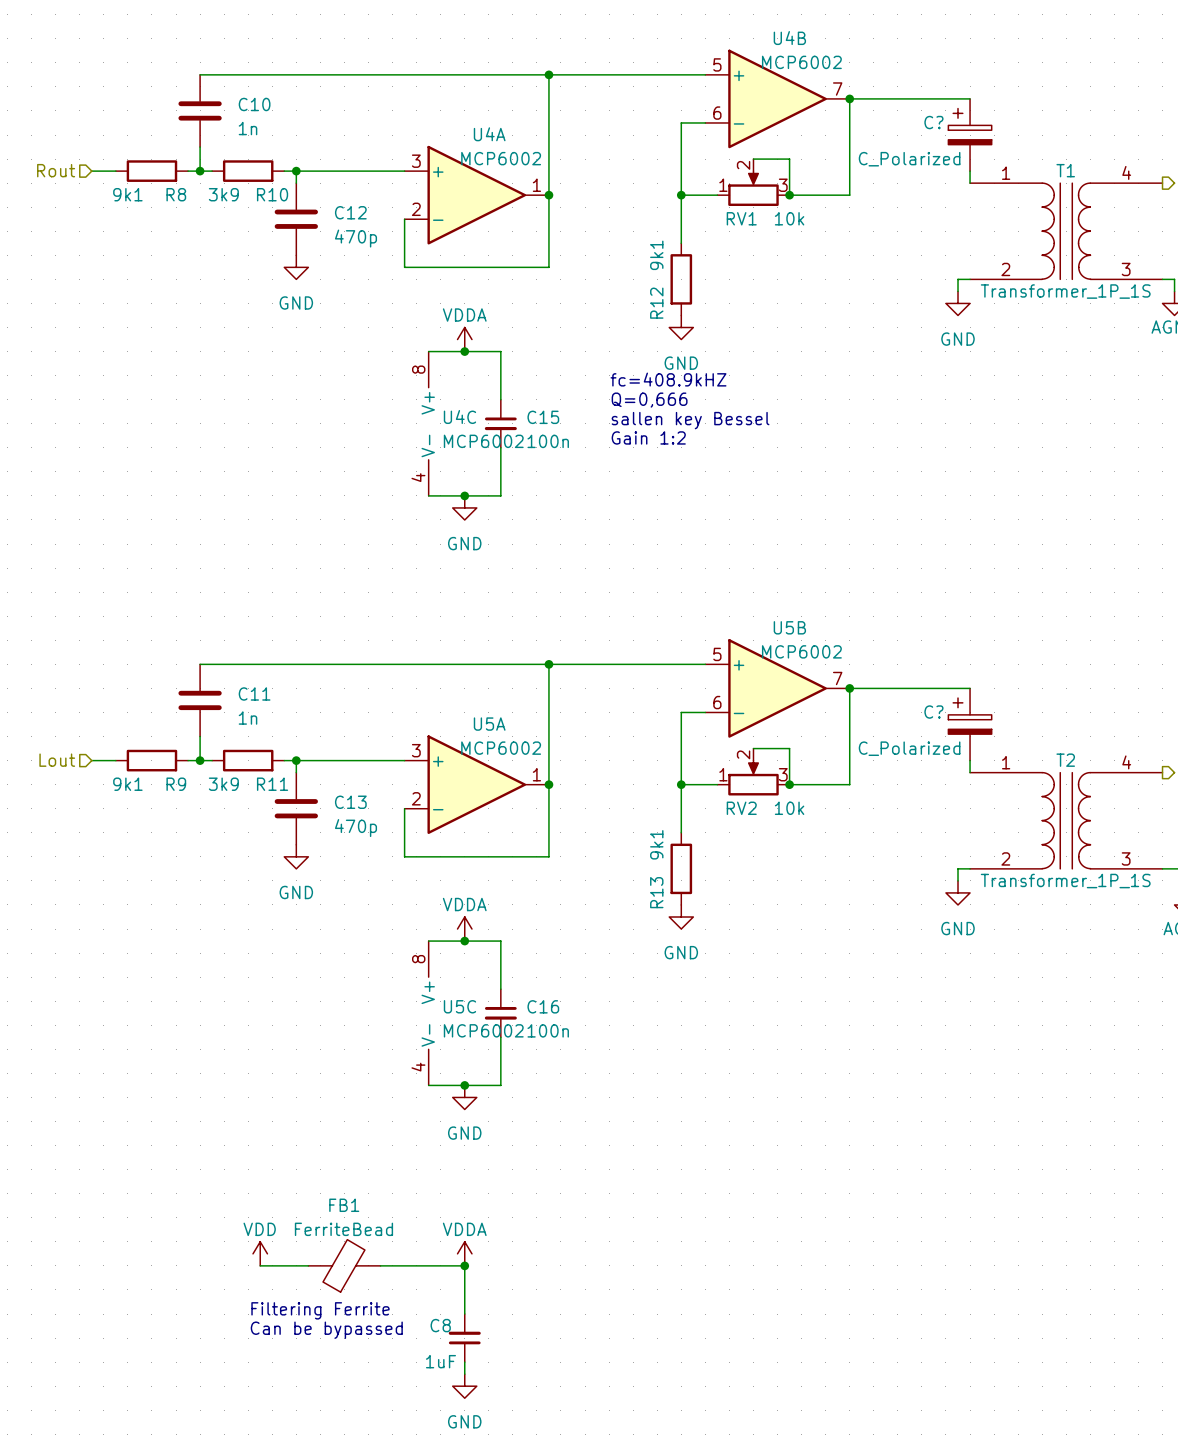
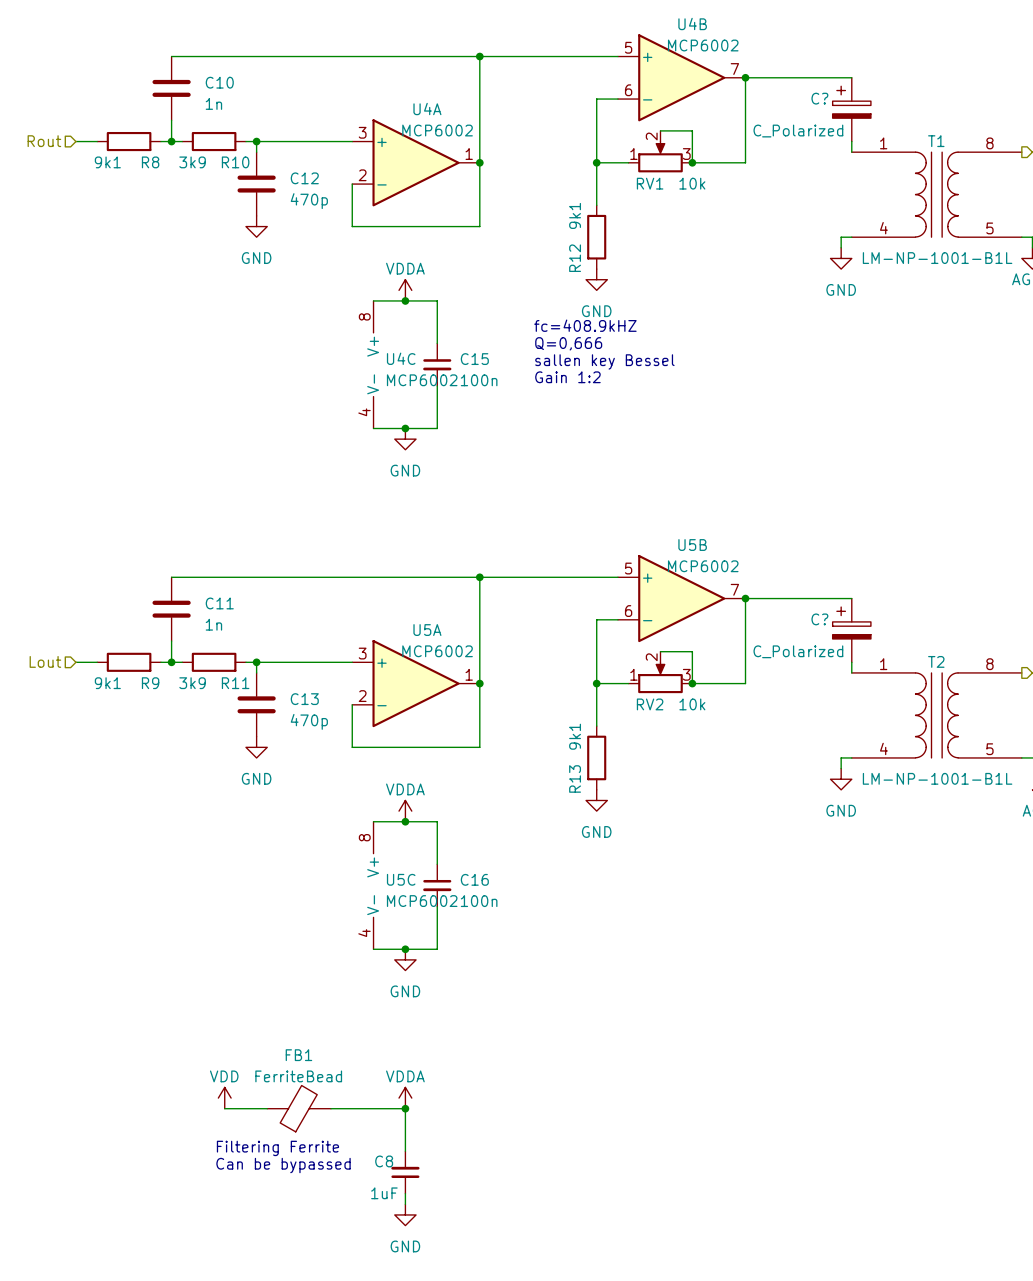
T1 pin number: 4 (1126, 172) -> 8 (989, 143)
T1 pin number: 2 (1005, 269) -> 4 (883, 228)
T1 pin number: 3 (1126, 269) -> 5 (989, 228)
T1 value: Transformer_1P_1S (1065, 291) -> LM-NP-1001-B1L (937, 258)
T2 pin number: 4 (1126, 762) -> 8 (989, 664)
T2 pin number: 2 (1005, 858) -> 4 (883, 748)
T2 pin number: 3 (1126, 858) -> 5 (989, 749)
T2 value: Transformer_1P_1S (1065, 881) -> LM-NP-1001-B1L (937, 778)

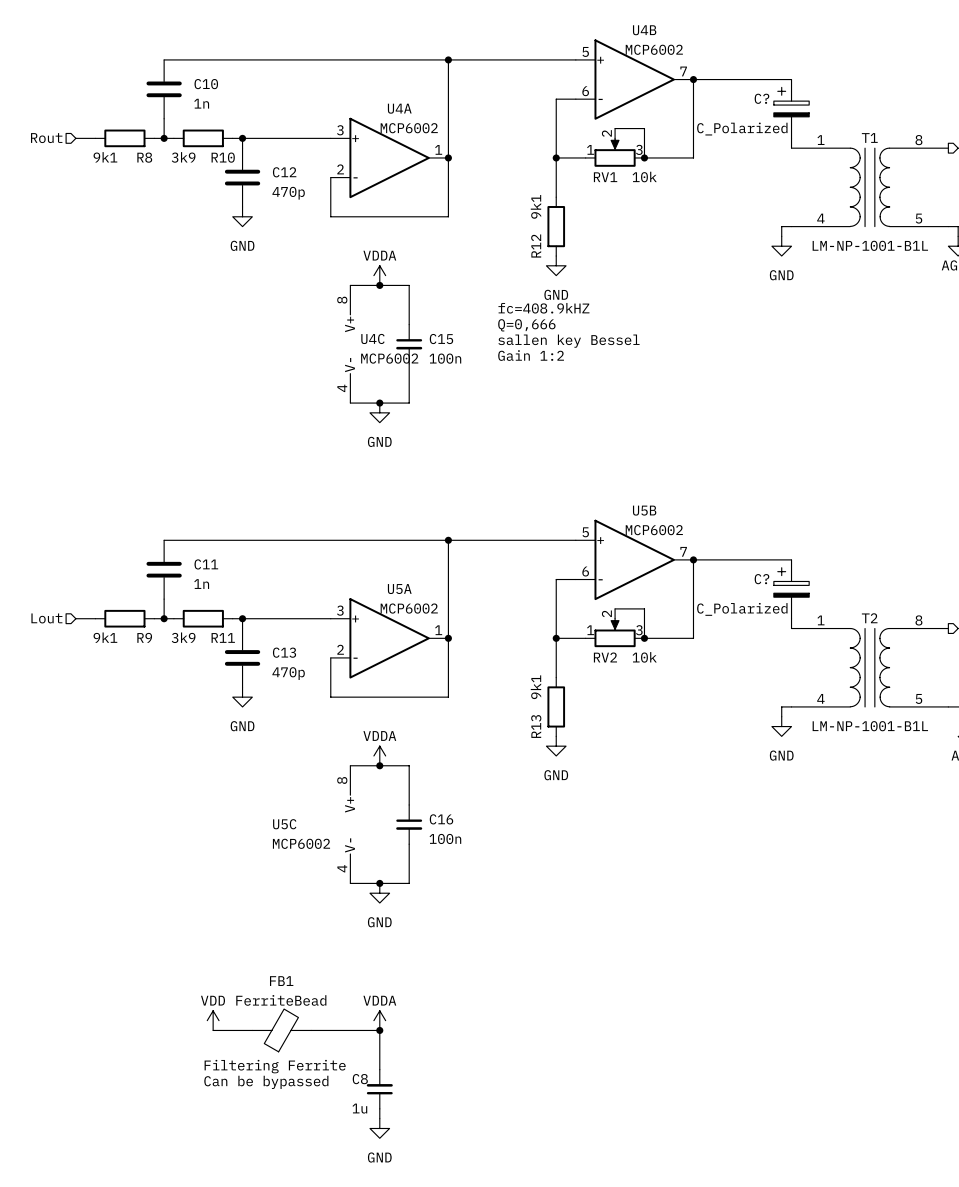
U5C name position: U5C (401, 879) -> U5C (284, 824)
U5C value position: MCP6002 (422, 901) -> MCP6002 (301, 843)
C8 value: 1uF (384, 1193) -> 1u (359, 1108)

